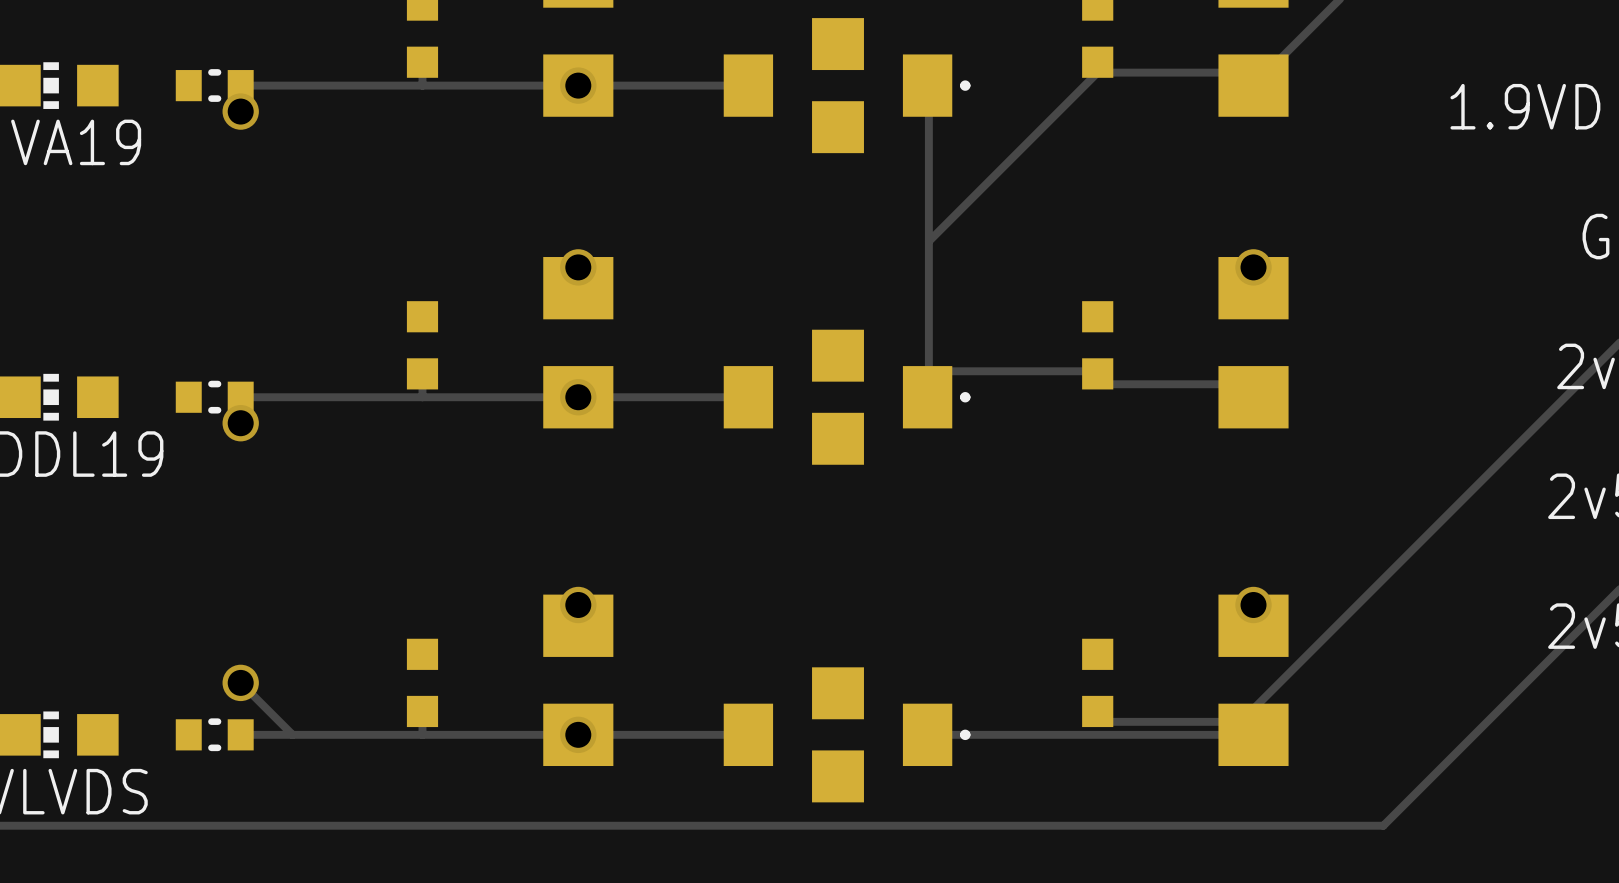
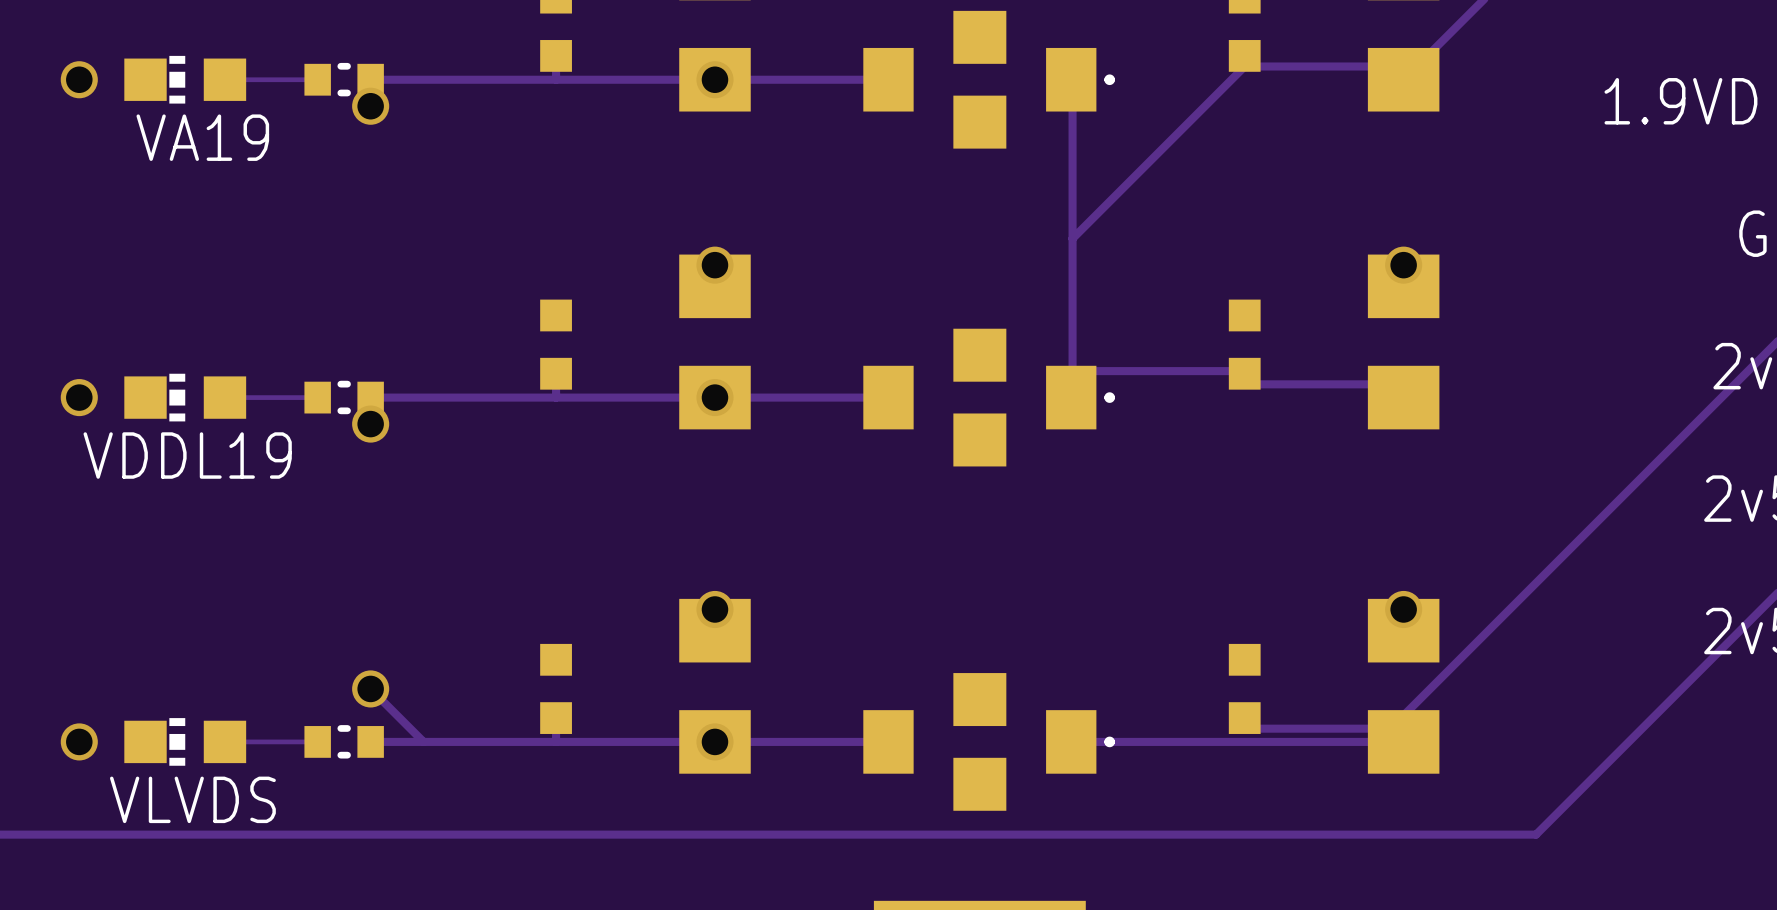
track: none -> (224, 79) (317, 79)
track: none -> (224, 397) (317, 397)
track: none -> (224, 741) (317, 741)

